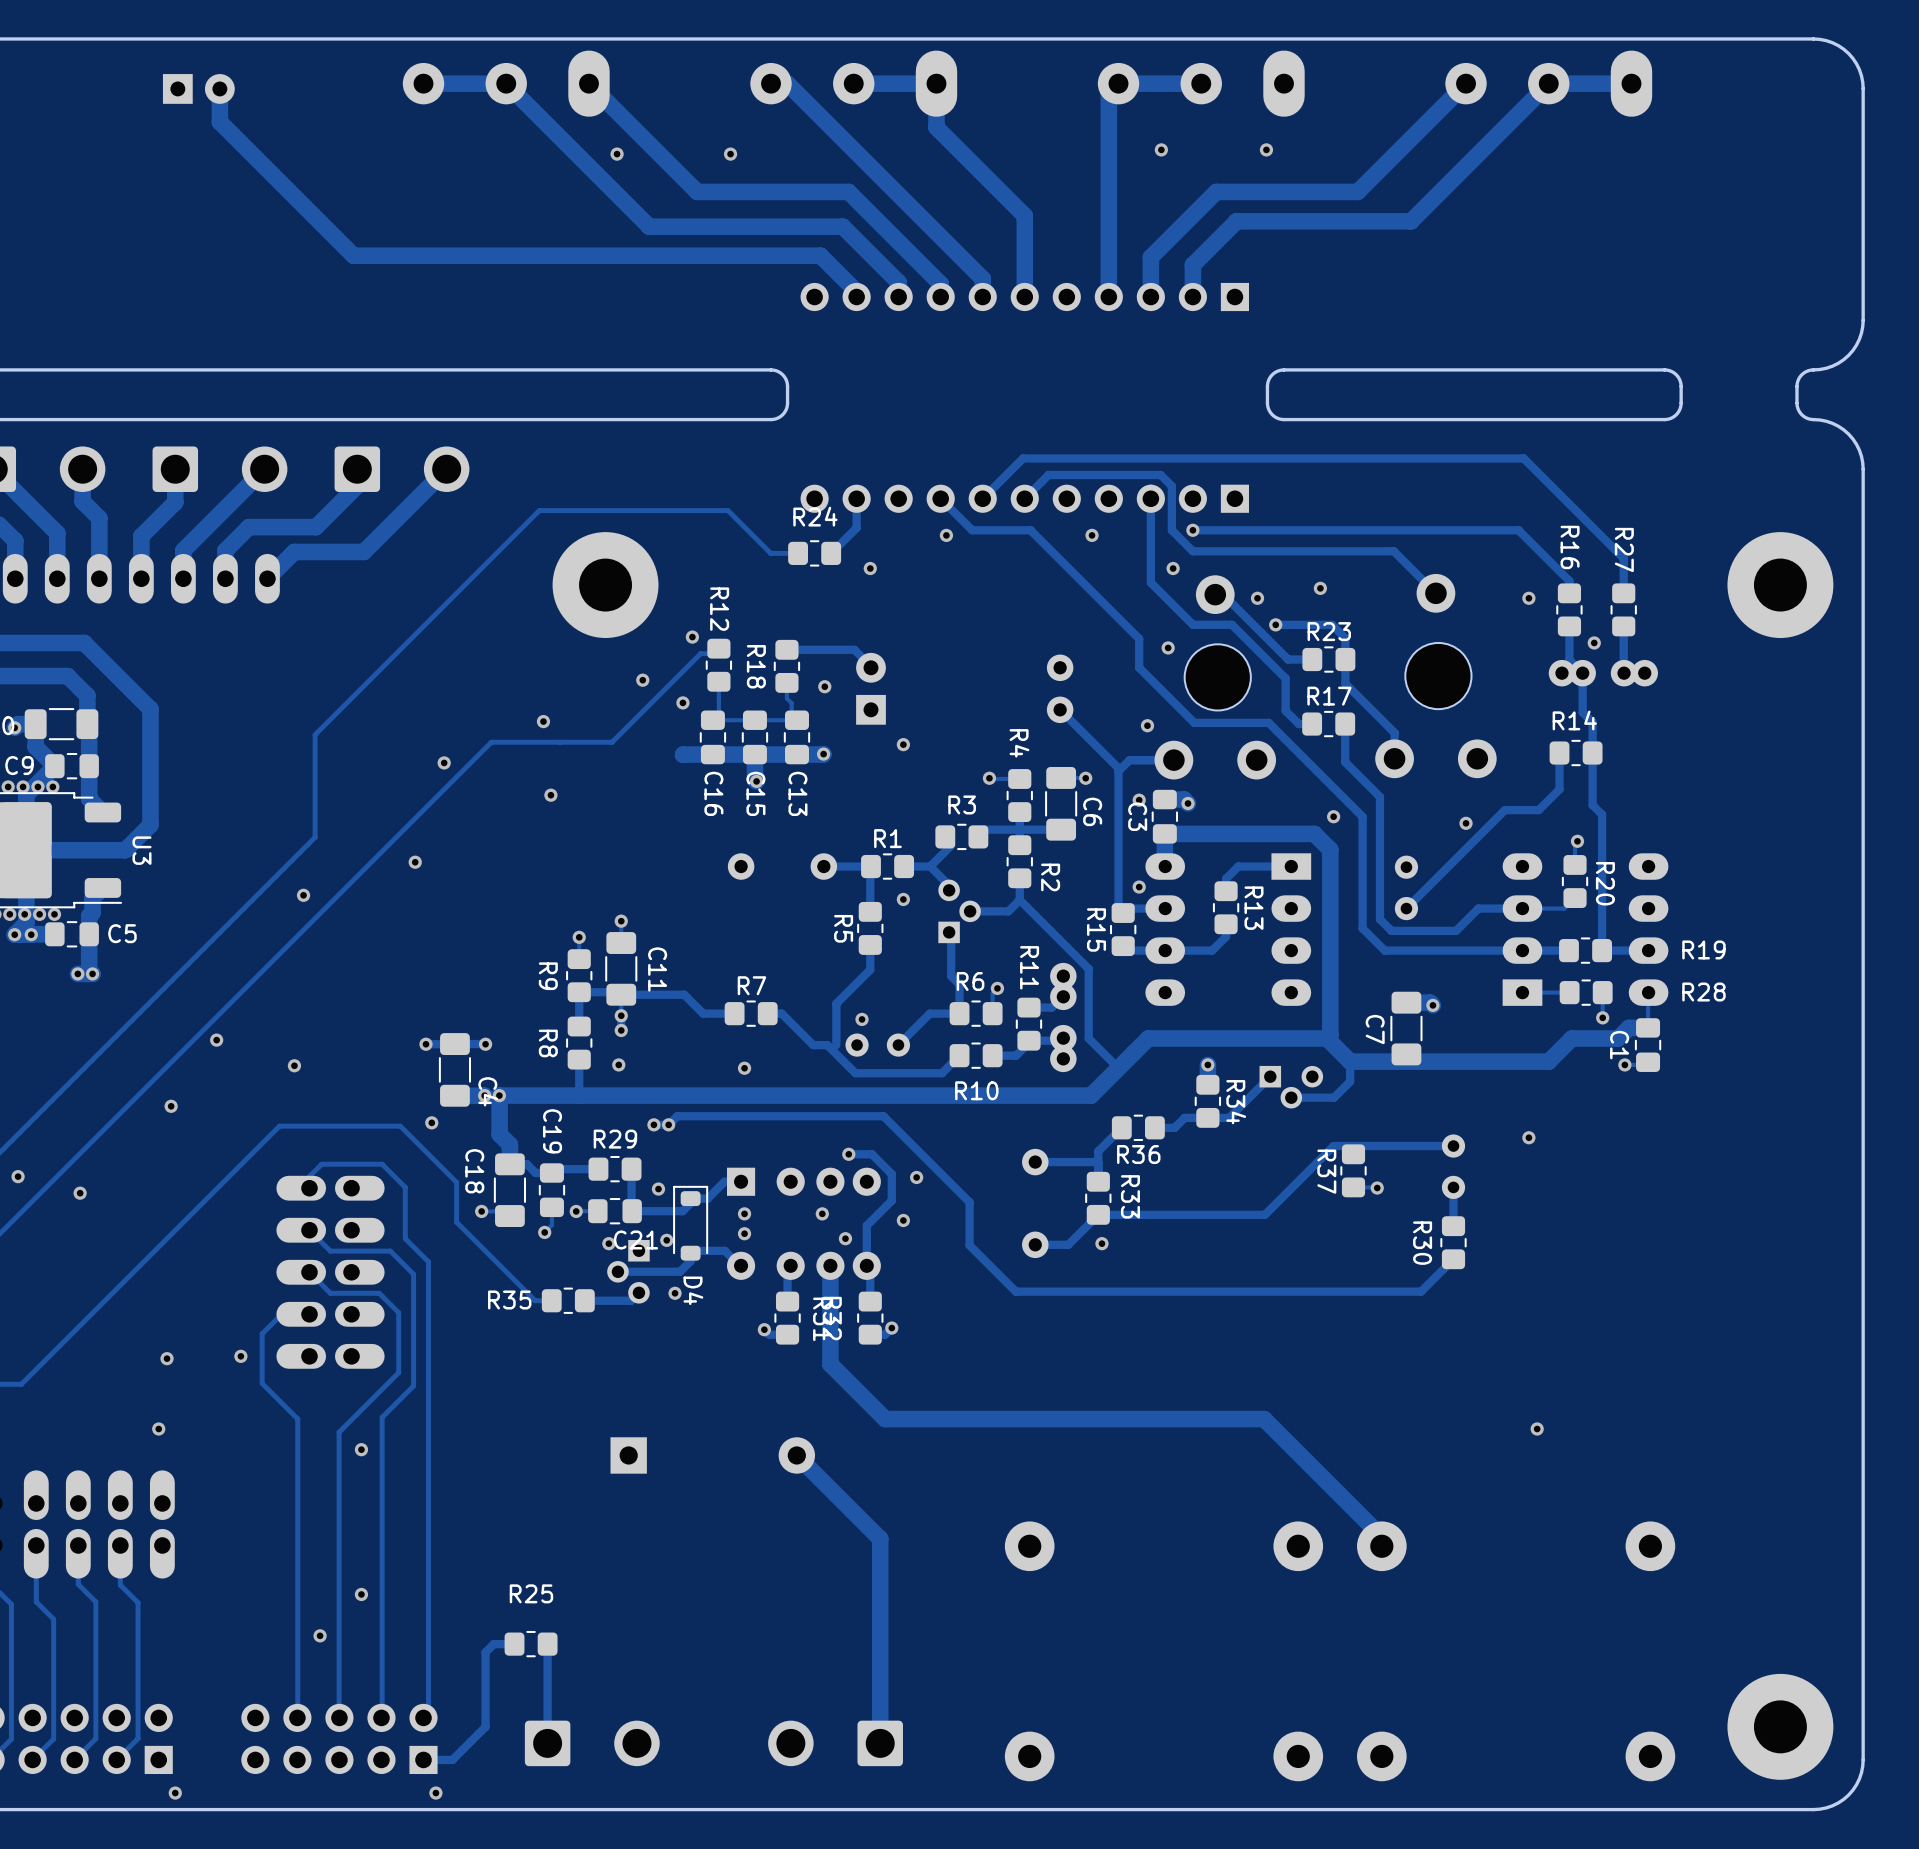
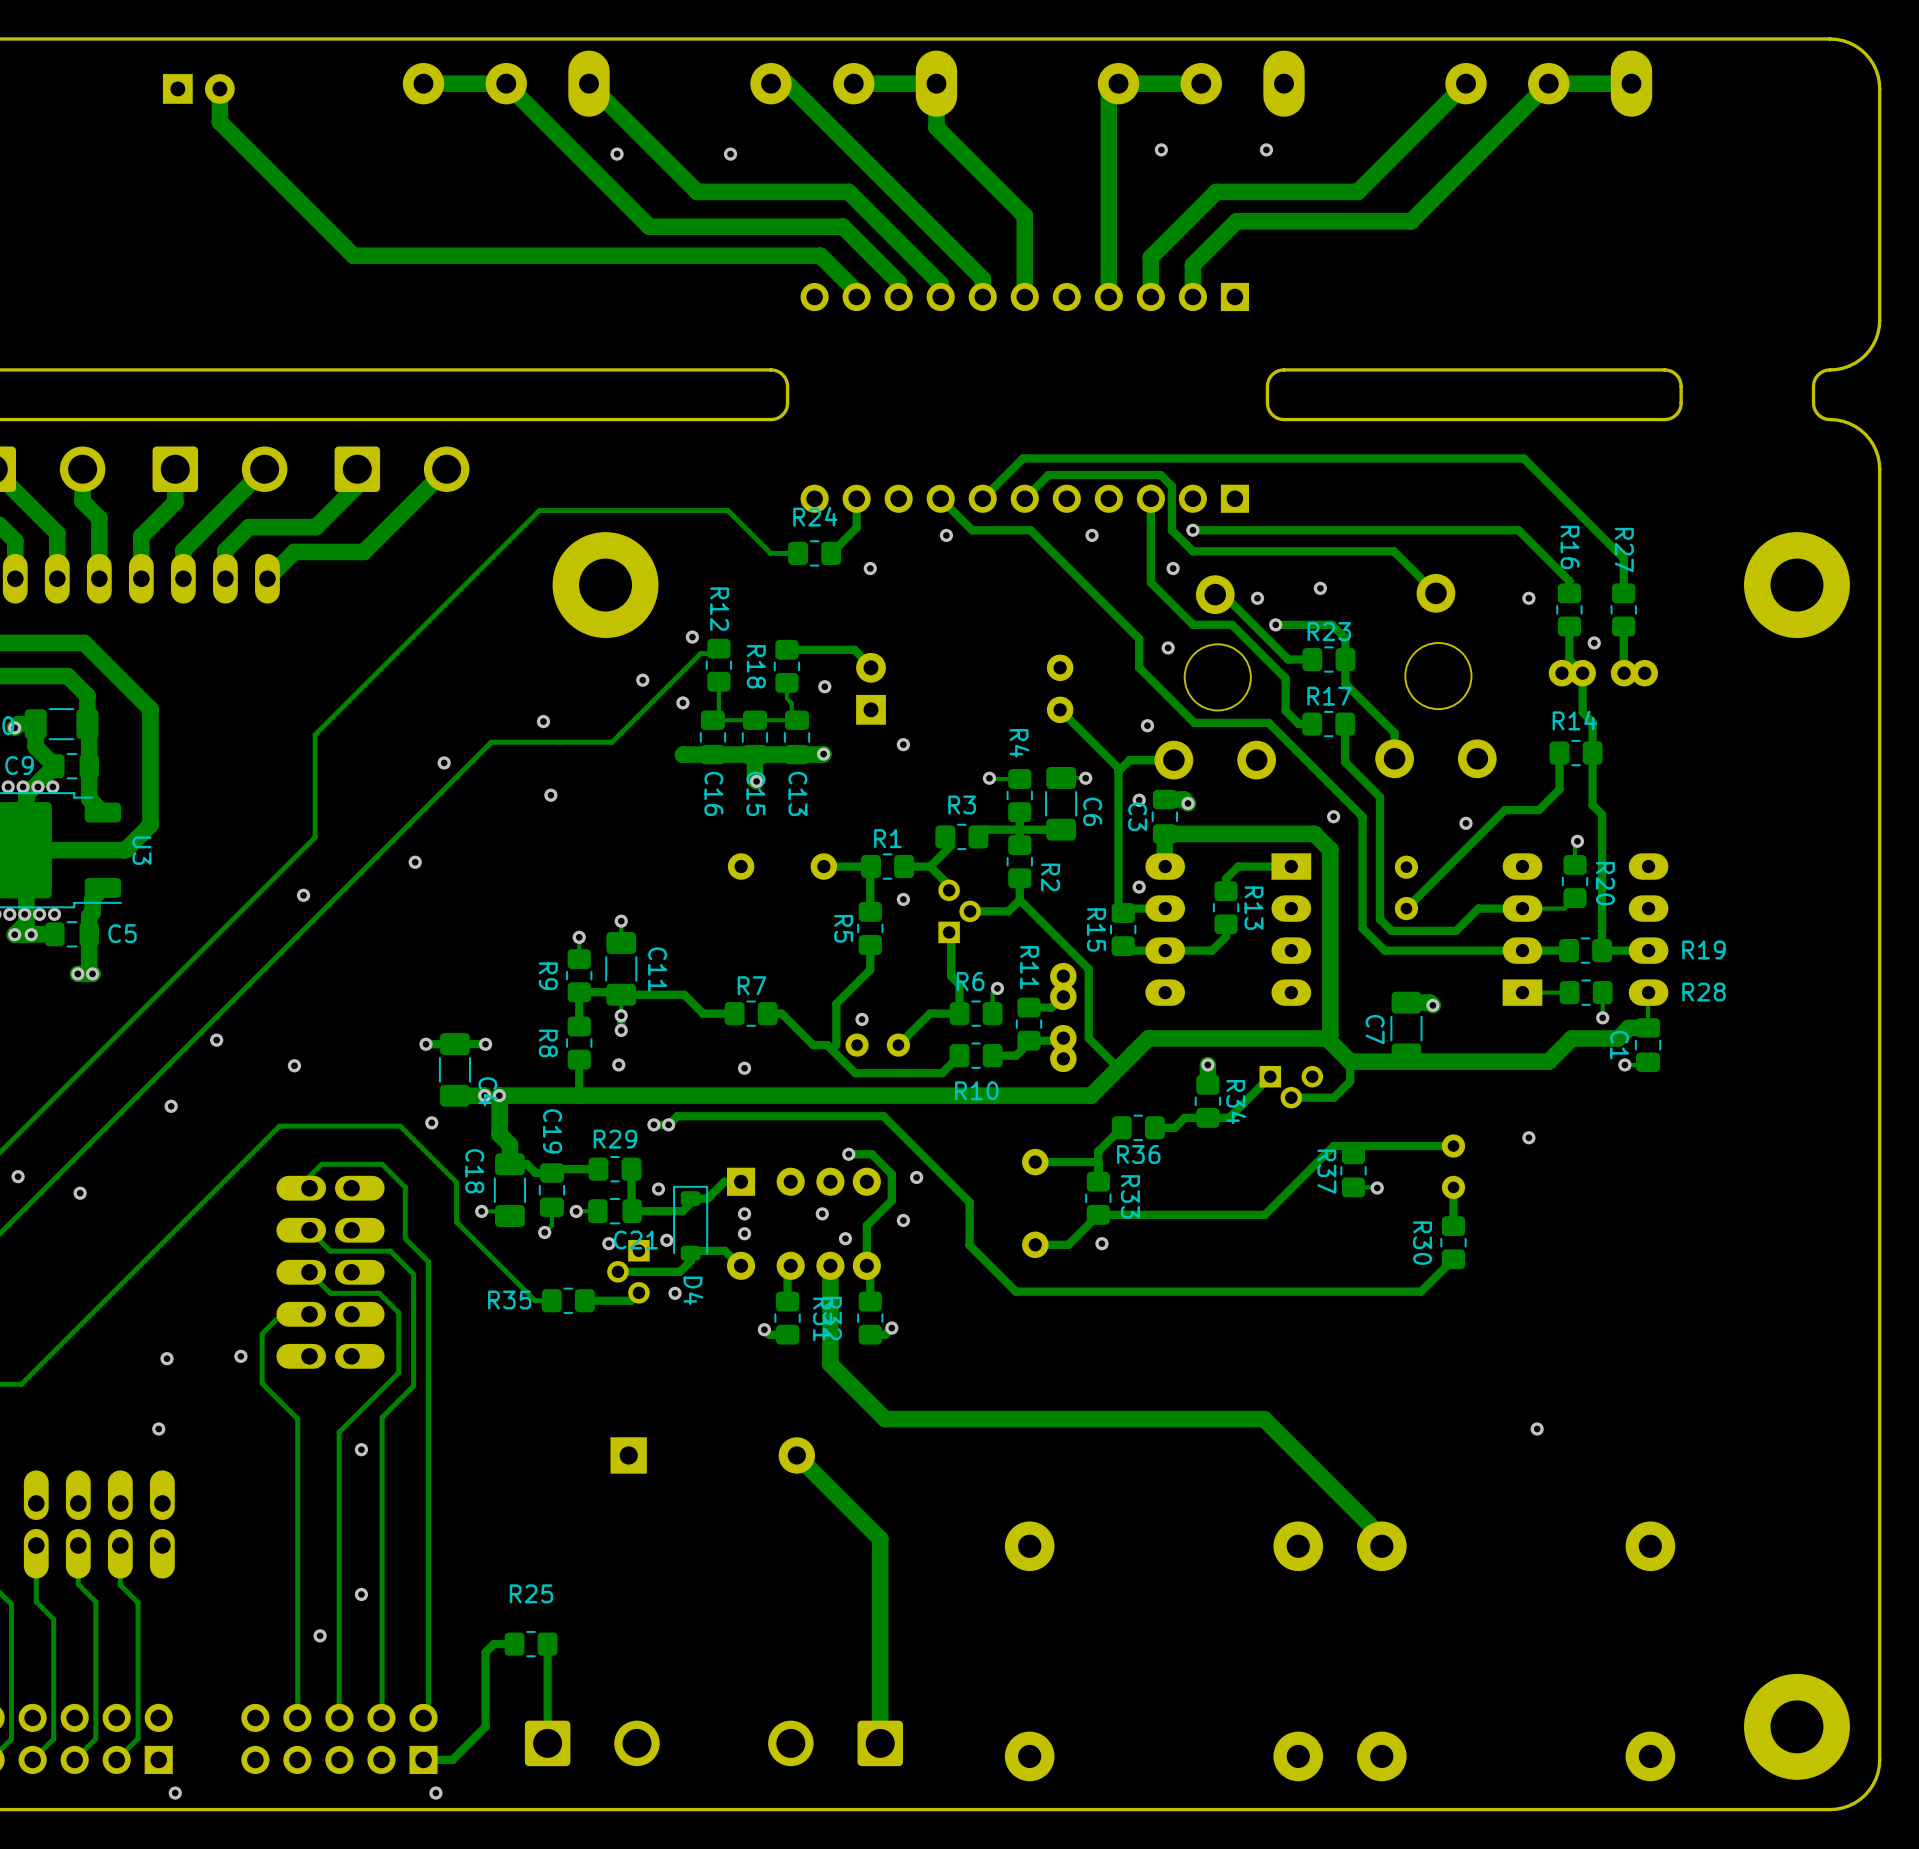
board edge: (1813, 38) (1832, 42) (1848, 53) (1859, 69) (1863, 88) (1863, 320) (1861, 333) (1852, 350) (1843, 359) (1826, 368) (1804, 372) (1799, 377) (1796, 386) (1797, 404) (1800, 413) (1808, 418) (1832, 423) (1848, 434) (1859, 450) (1863, 469) (1863, 1759) (1859, 1778) (1848, 1795) (1832, 1805) (1813, 1809) -> (1813, 38) (1842, 40) (1860, 49) (1873, 63) (1878, 75) (1879, 88) (1879, 320) (1878, 333) (1873, 345) (1860, 359) (1842, 368) (1821, 372) (1816, 377) (1813, 386) (1813, 404) (1817, 413) (1824, 418) (1849, 423) (1865, 434) (1875, 450) (1879, 469) (1879, 1759) (1878, 1772) (1873, 1784) (1860, 1799) (1842, 1807) (1813, 1809)
part position: (1780, 585) -> (1796, 585)
part position: (1780, 1726) -> (1796, 1726)

